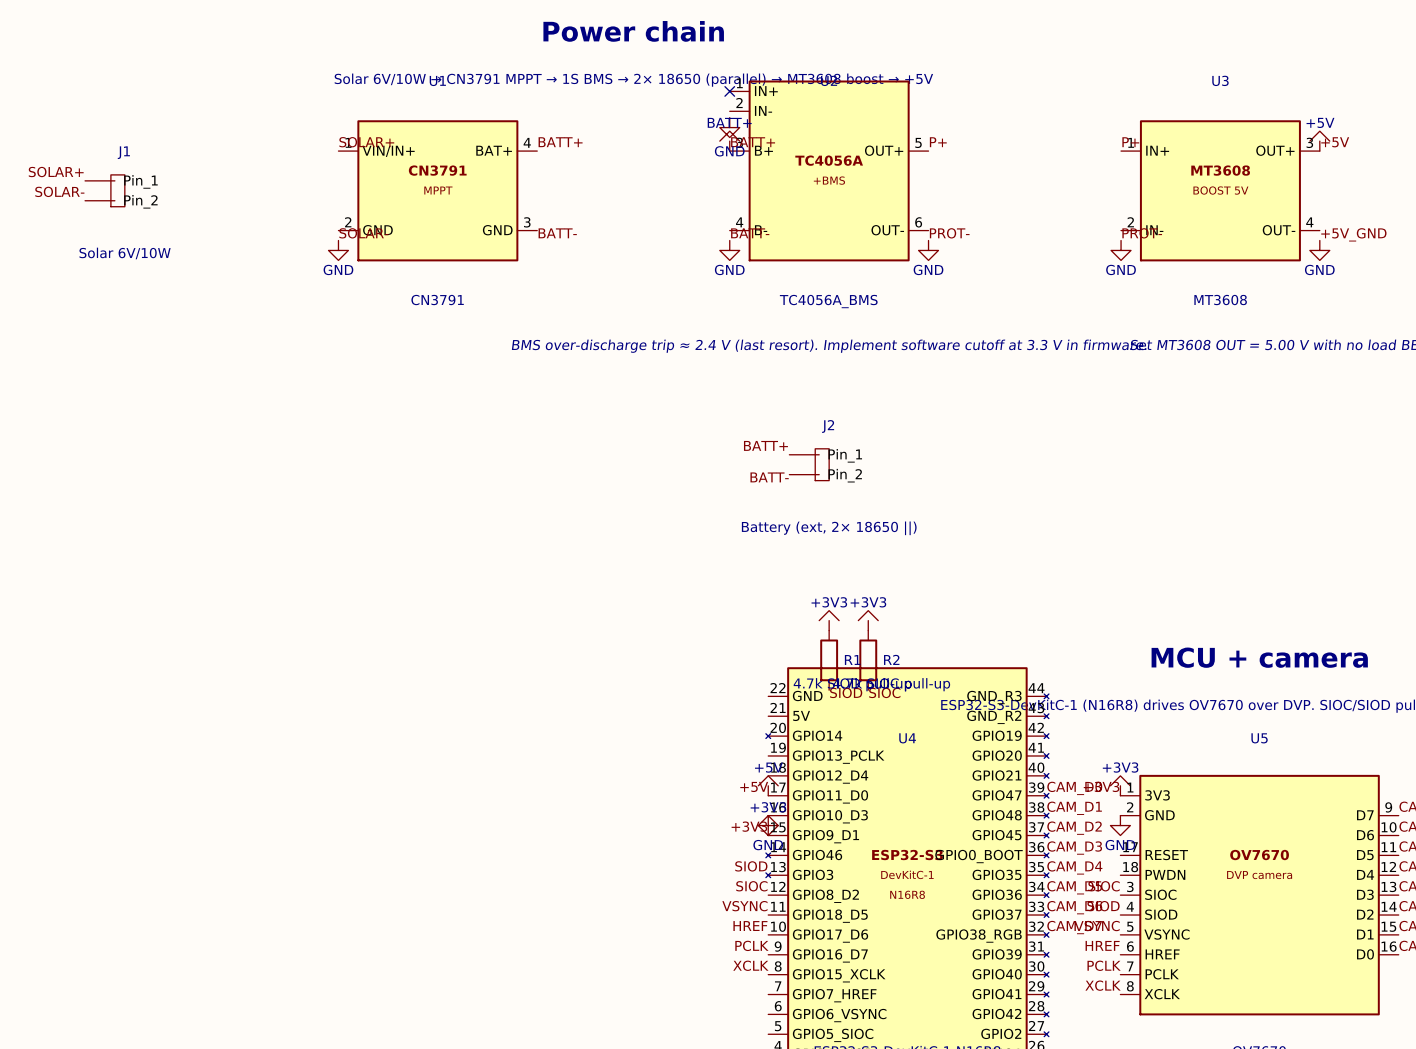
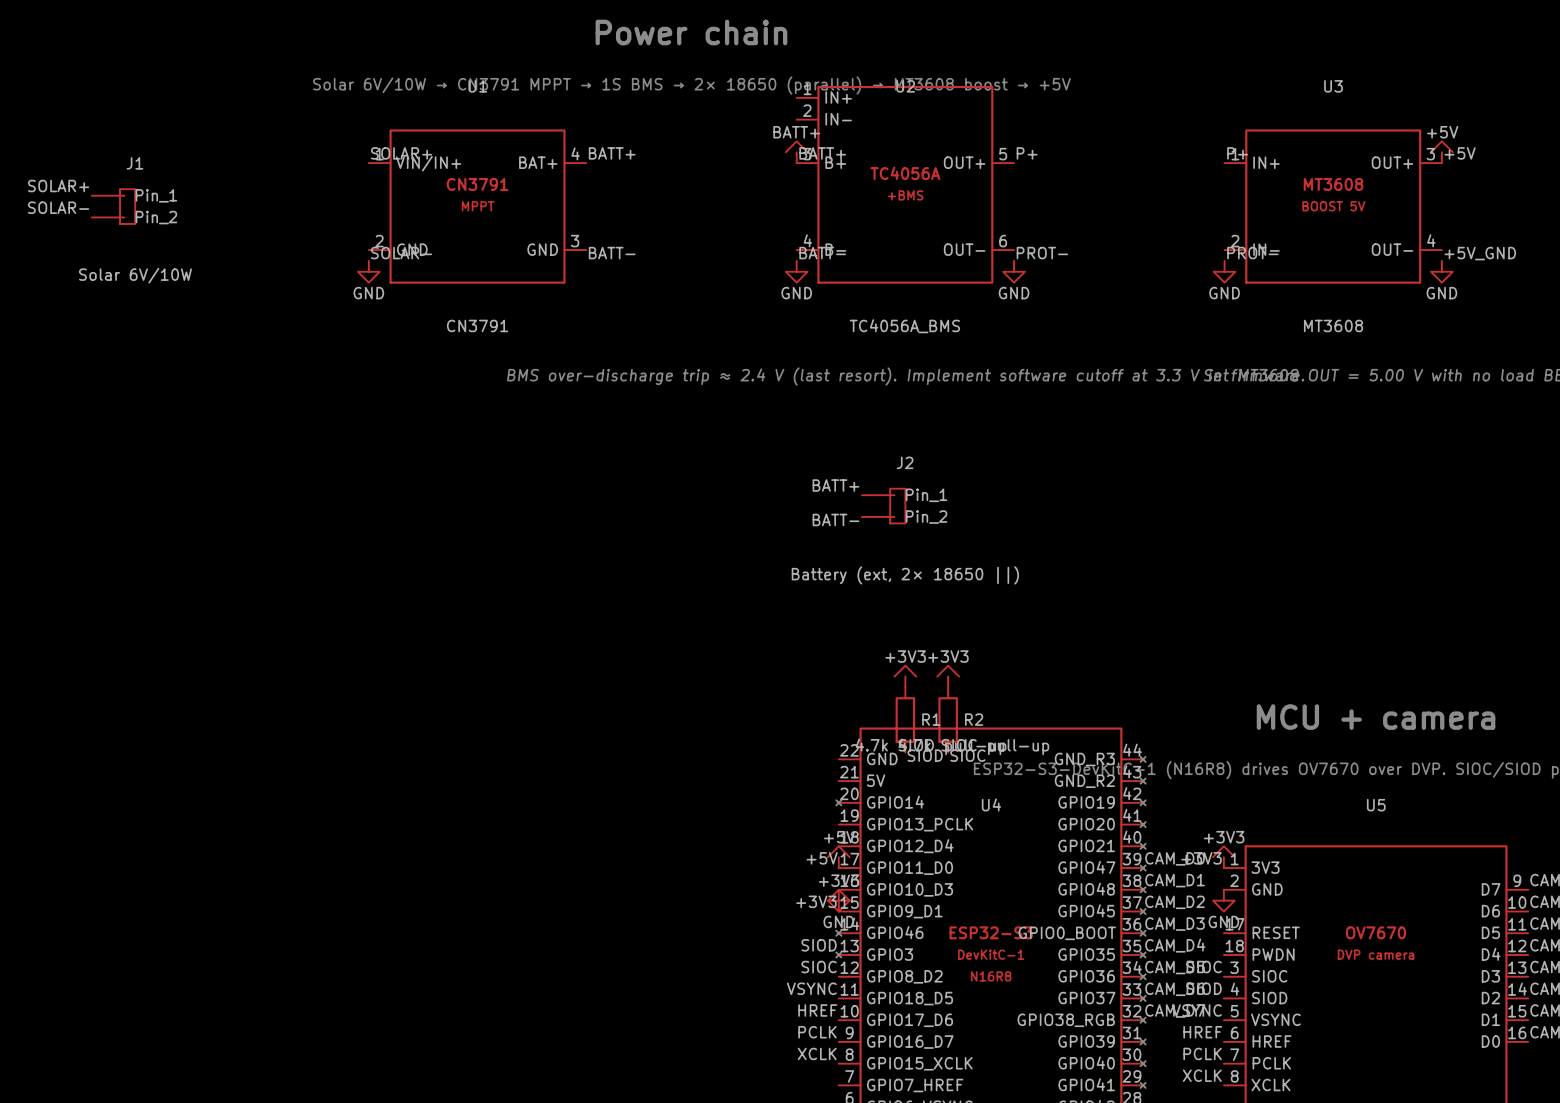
no-connect mark: (729, 91) -> none
power symbol: GND (729, 127) -> none

